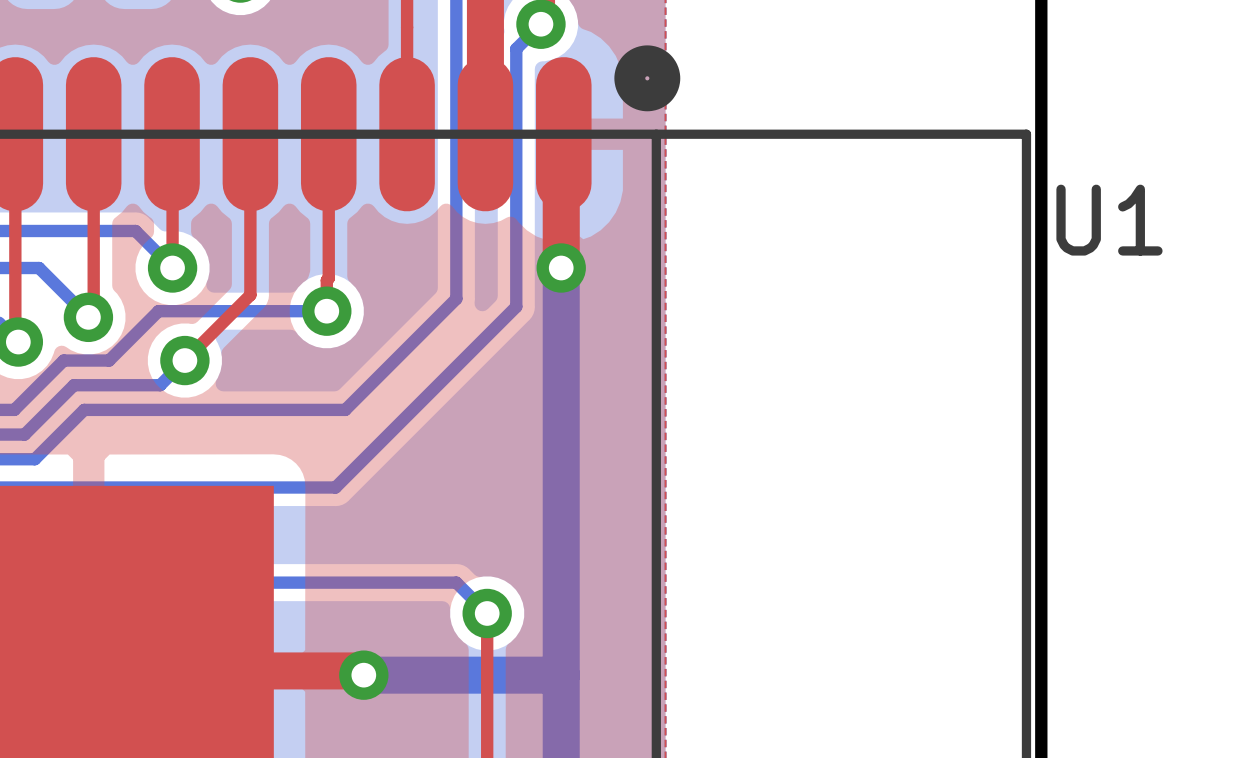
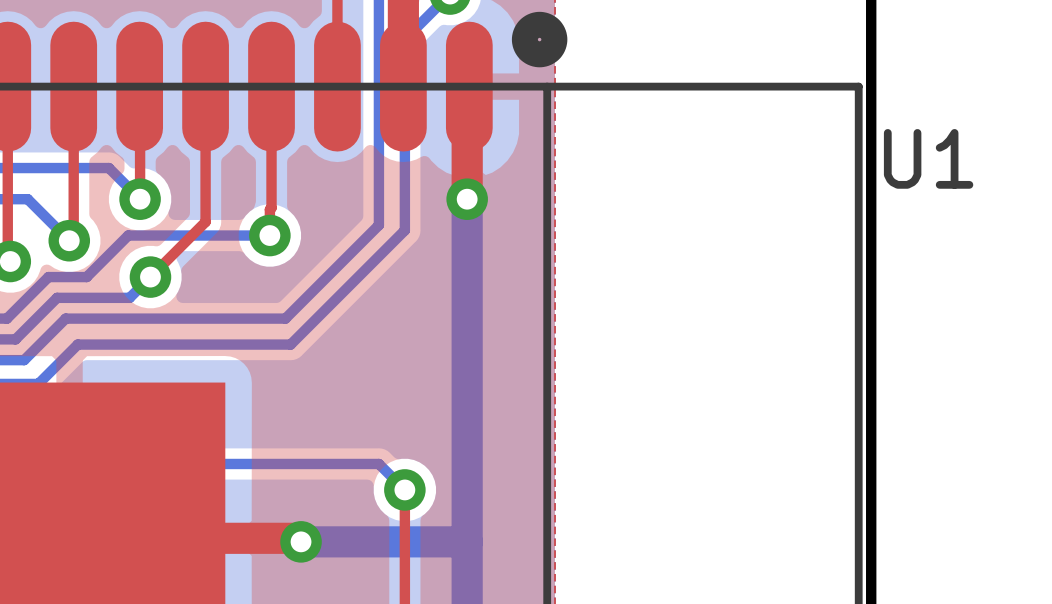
bottom track: (516, 48) (516, 306) (335, 487) (52, 487) -> (429, 14) (404, 39) (404, 230) (290, 344) (77, 344) (39, 383)

